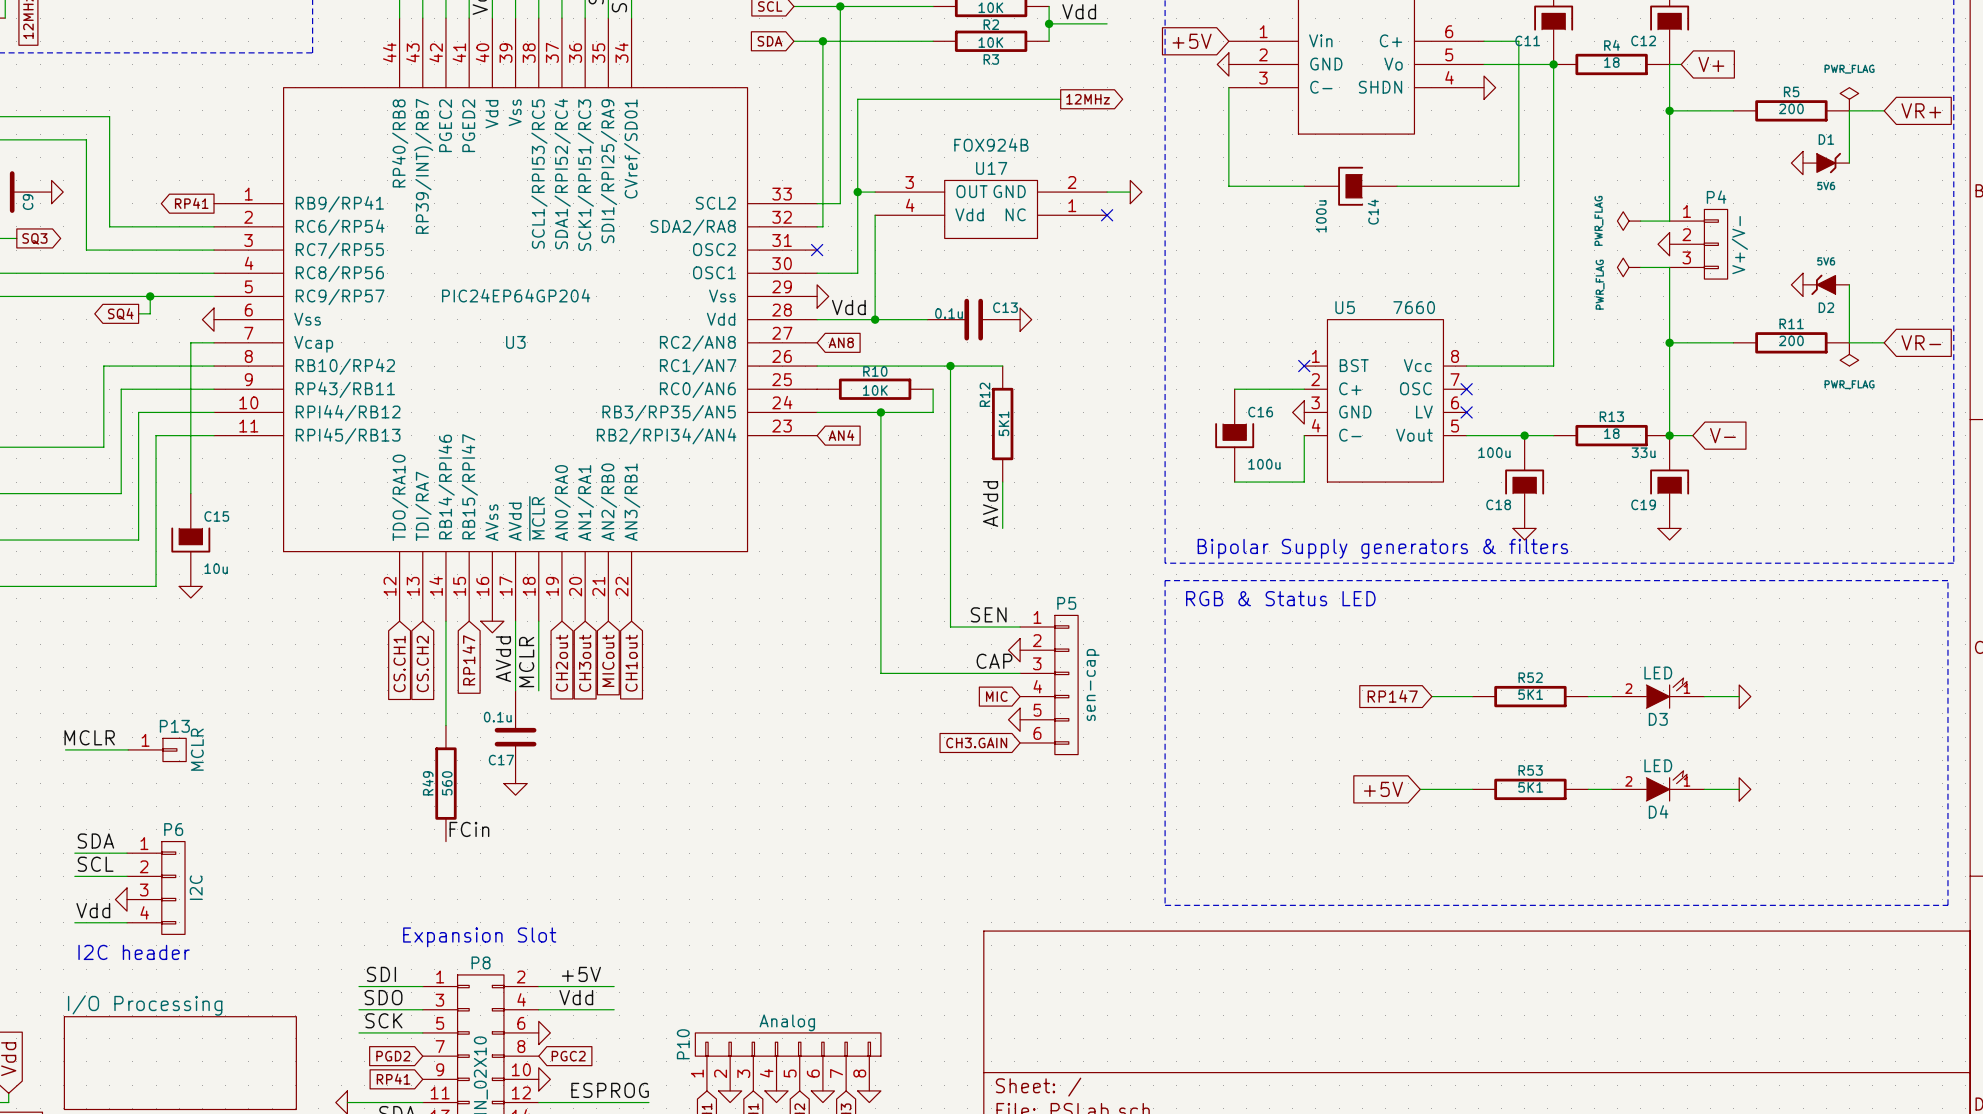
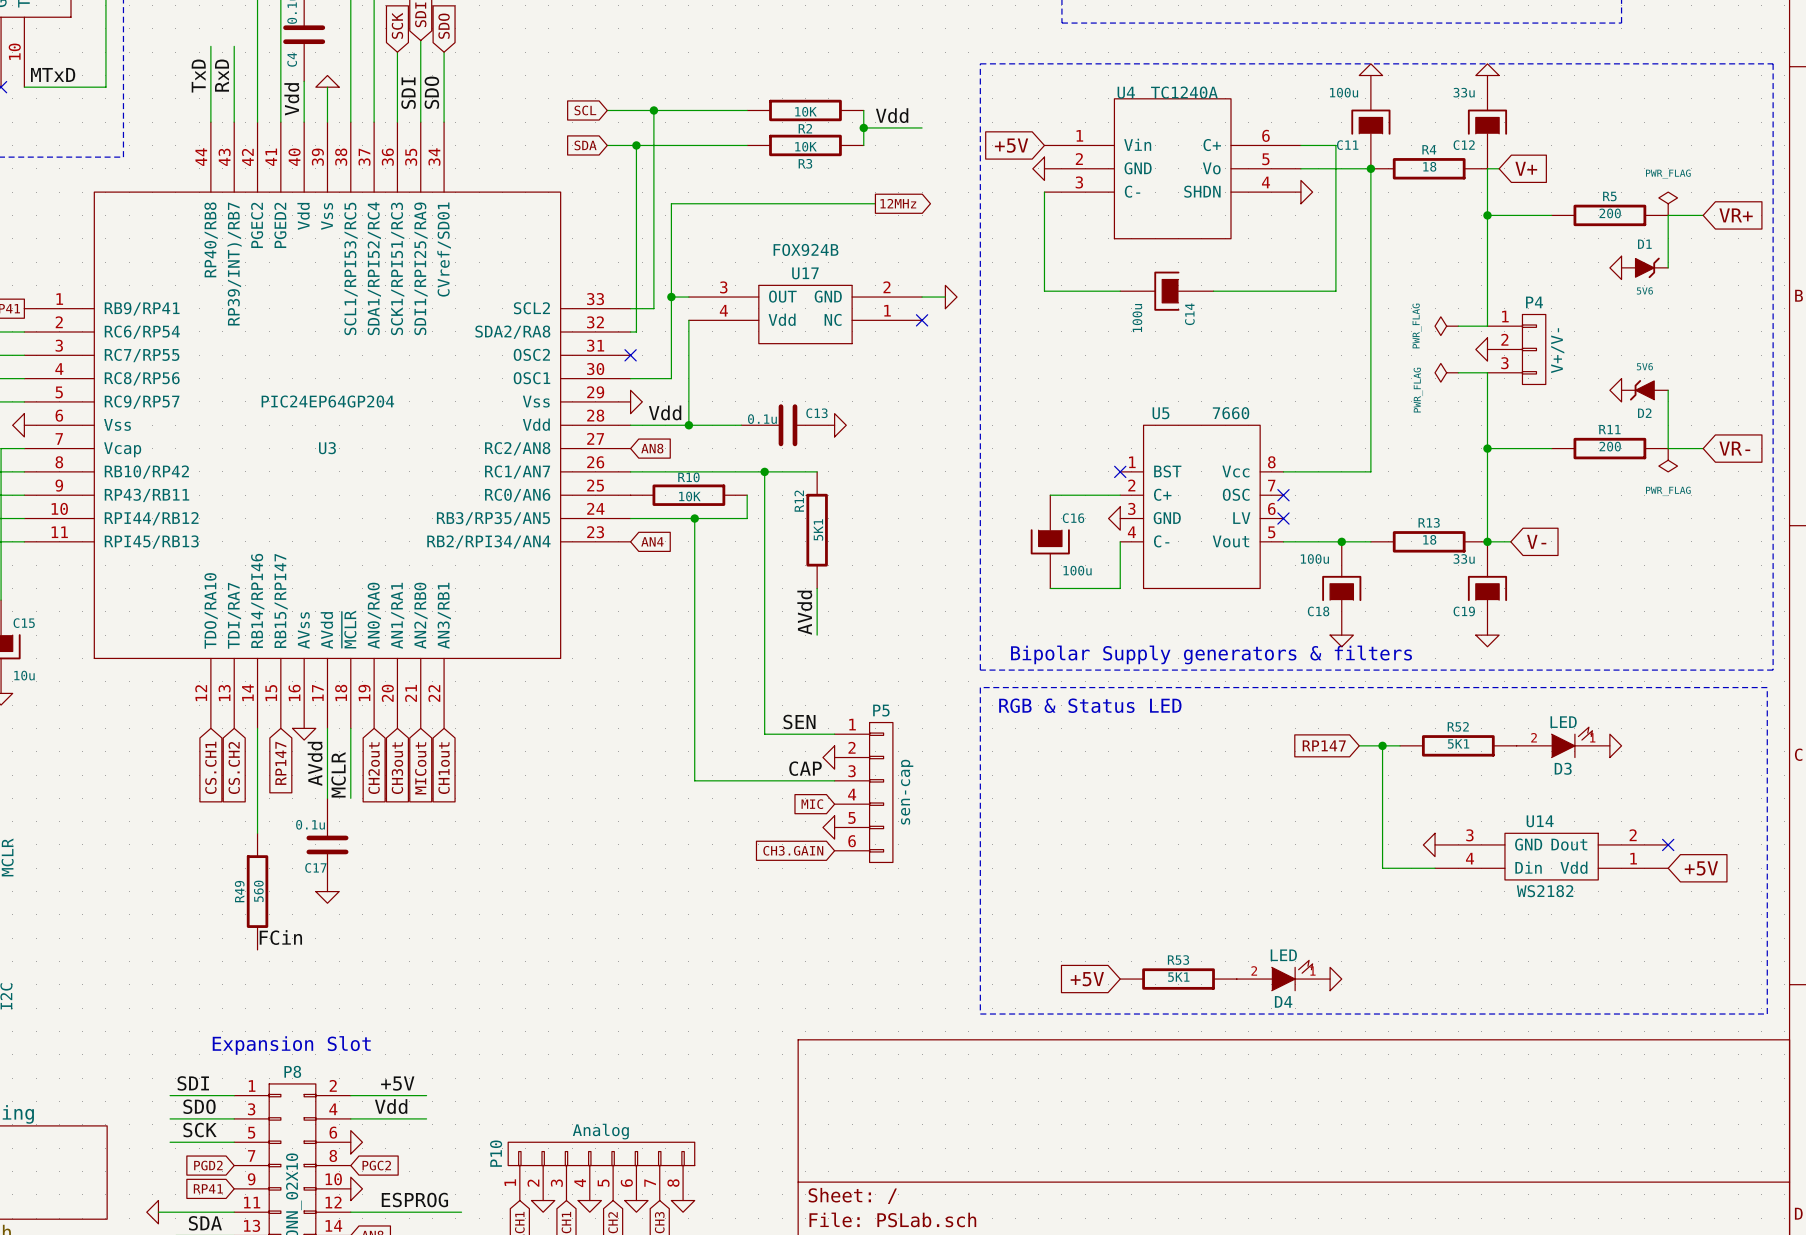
wire: none -> (1382, 745) (1382, 868) (1435, 868)
junction: none -> (1382, 745)
power symbol: none -> (1615, 745)
D3 position: (1658, 693) -> (1563, 742)
global label position: RP147 (1392, 696) -> RP147 (1324, 745)
wire: (1431, 696) (1472, 696) -> (1359, 745) (1400, 745)
R52 position: (1530, 696) -> (1458, 745)
wire: (1588, 696) (1611, 696) -> none
wire: (1704, 696) (1739, 696) -> none
power symbol: (1745, 696) -> none
power symbol: none -> (1429, 844)
no-connect mark: none -> (1668, 844)
U14: none -> WS2182 (1551, 856)
global label: none -> +5V (1701, 868)
D4 position: (1658, 785) -> (1283, 975)
global label position: +5V (1383, 789) -> +5V (1087, 979)
wire: (1420, 789) (1472, 789) -> none
R53 position: (1530, 789) -> (1178, 979)
wire: (1588, 789) (1611, 789) -> none
wire: (1704, 789) (1739, 789) -> none
power symbol: (1745, 789) -> none
power symbol: none -> (1335, 979)

